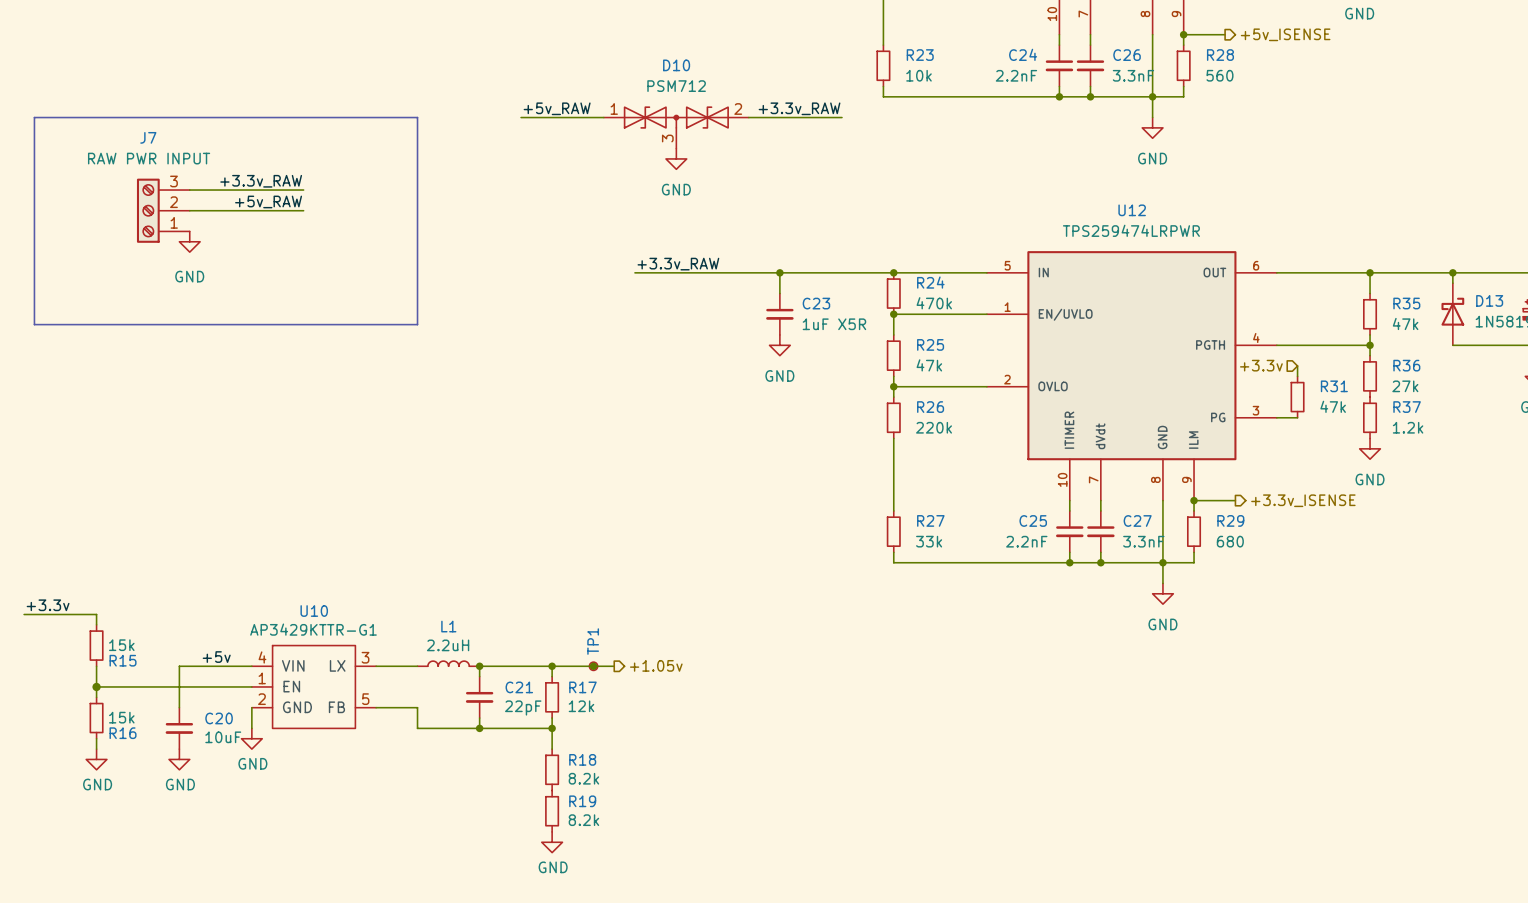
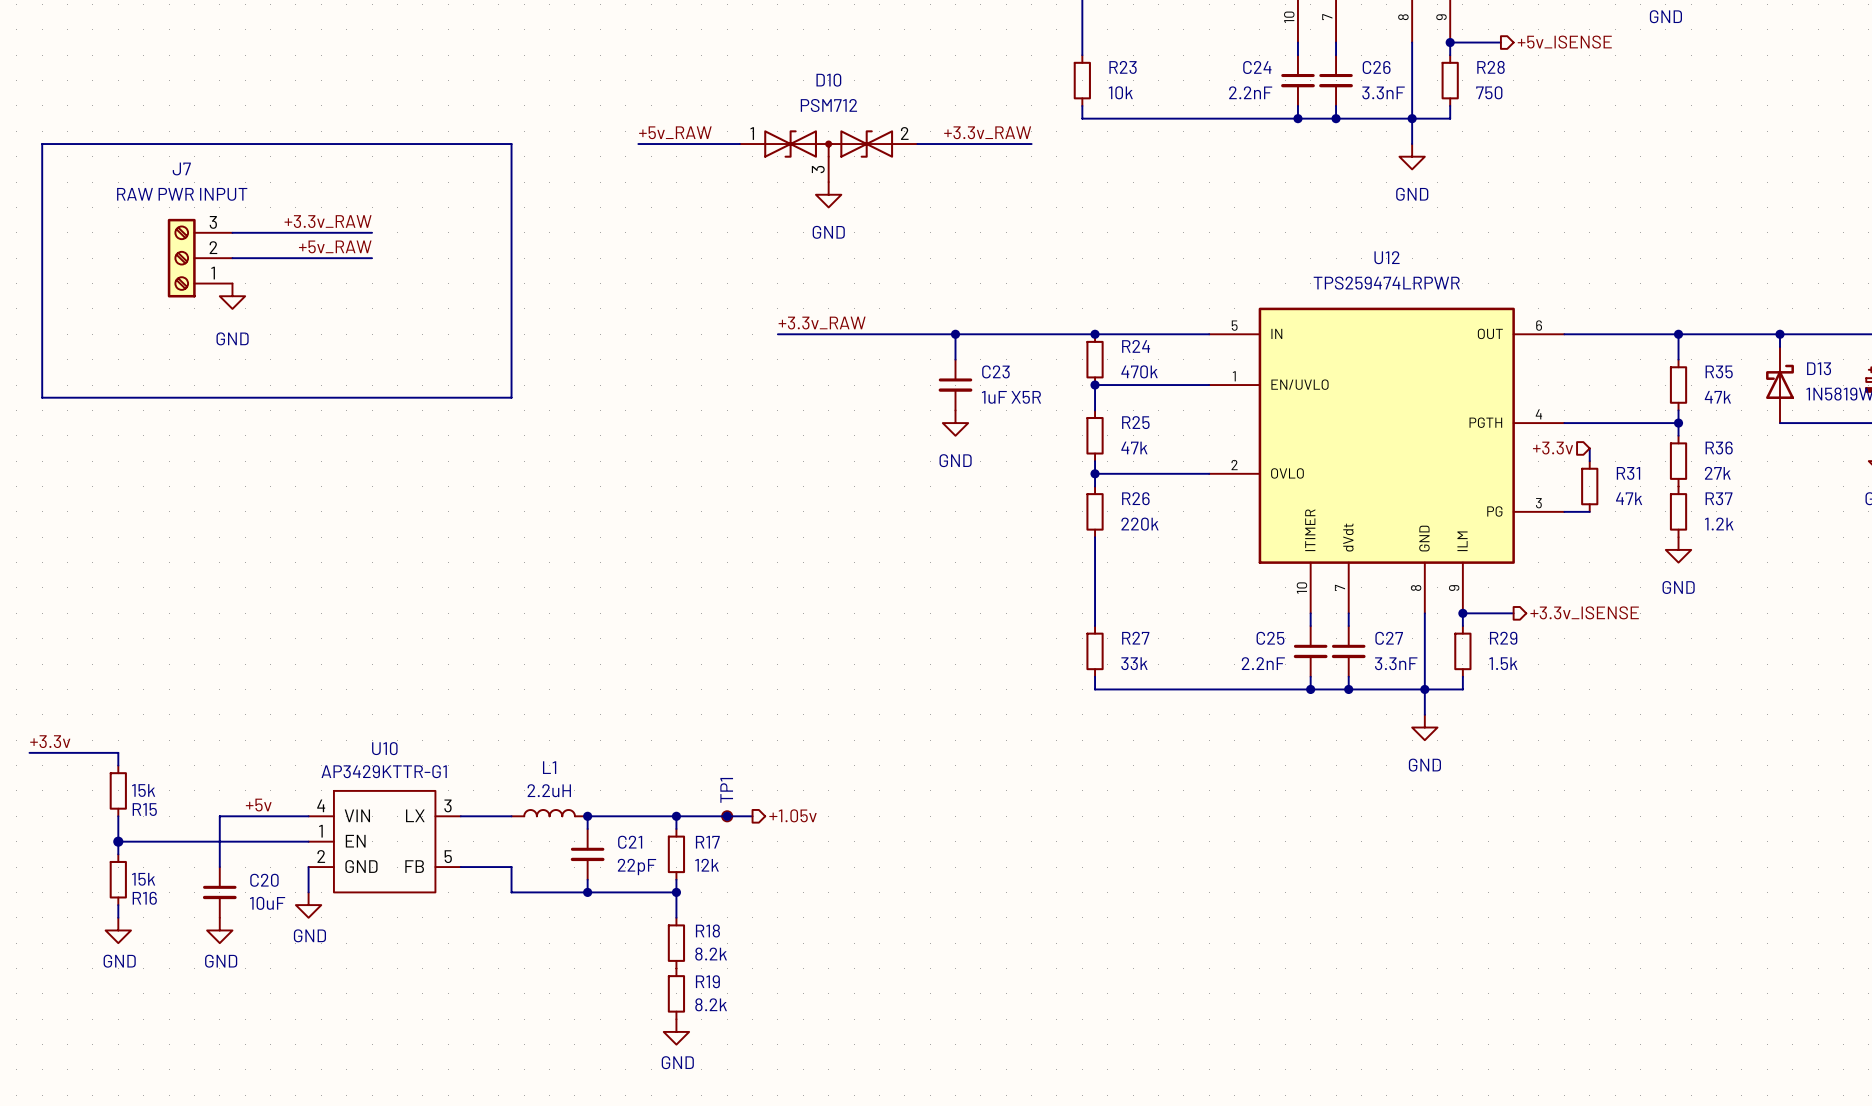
R28 value: 560 (1219, 75) -> 750 (1489, 92)
R29 value: 680 (1230, 541) -> 1.5k (1503, 663)

